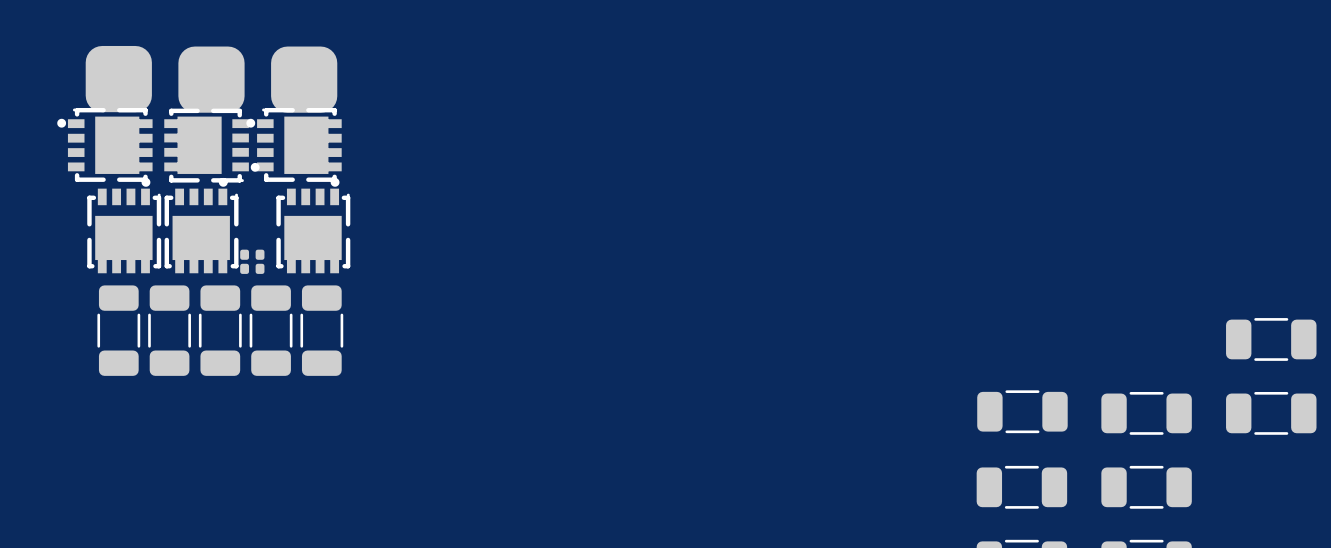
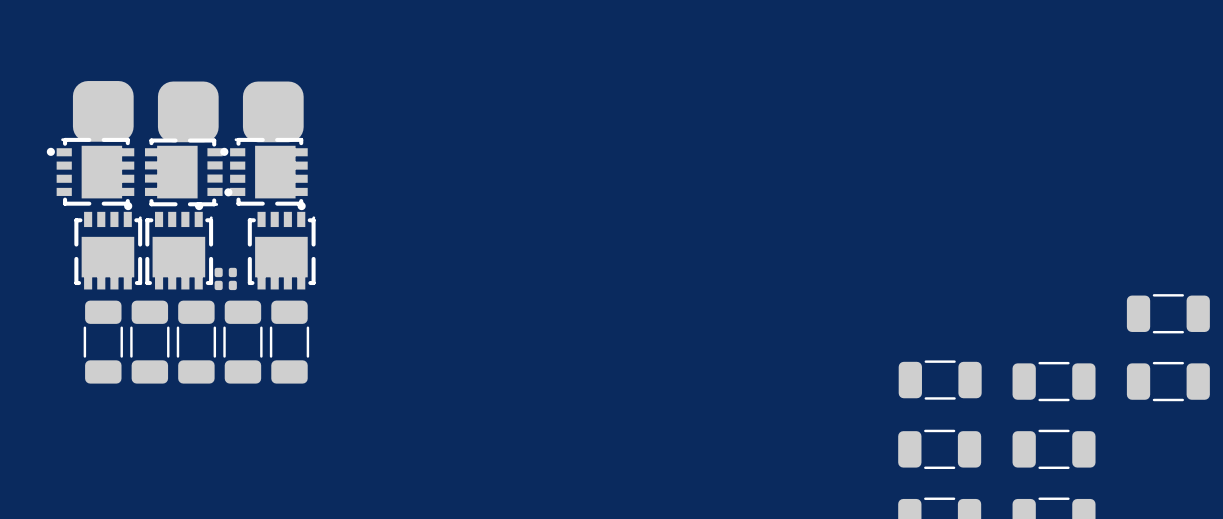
part position: (118, 79) -> (103, 111)
part position: (211, 79) -> (188, 111)
part position: (304, 79) -> (273, 111)
part: (104, 144) -> none
part: (294, 144) -> none
part: (211, 145) -> none
part: none -> (90, 171)
part: none -> (263, 171)
part: none -> (188, 172)
part: (124, 225) -> none
part: (201, 225) -> none
part: (313, 225) -> none
part: (244, 261) -> none
part: (260, 261) -> none
part: none -> (108, 245)
part: none -> (179, 245)
part: none -> (281, 245)
part: none -> (218, 278)
part: none -> (232, 278)
part: (118, 330) -> none
part: (169, 330) -> none
part: (220, 330) -> none
part: (271, 330) -> none
part: (321, 330) -> none
part: none -> (103, 342)
part: none -> (149, 342)
part: none -> (196, 342)
part: none -> (242, 342)
part: none -> (289, 342)

